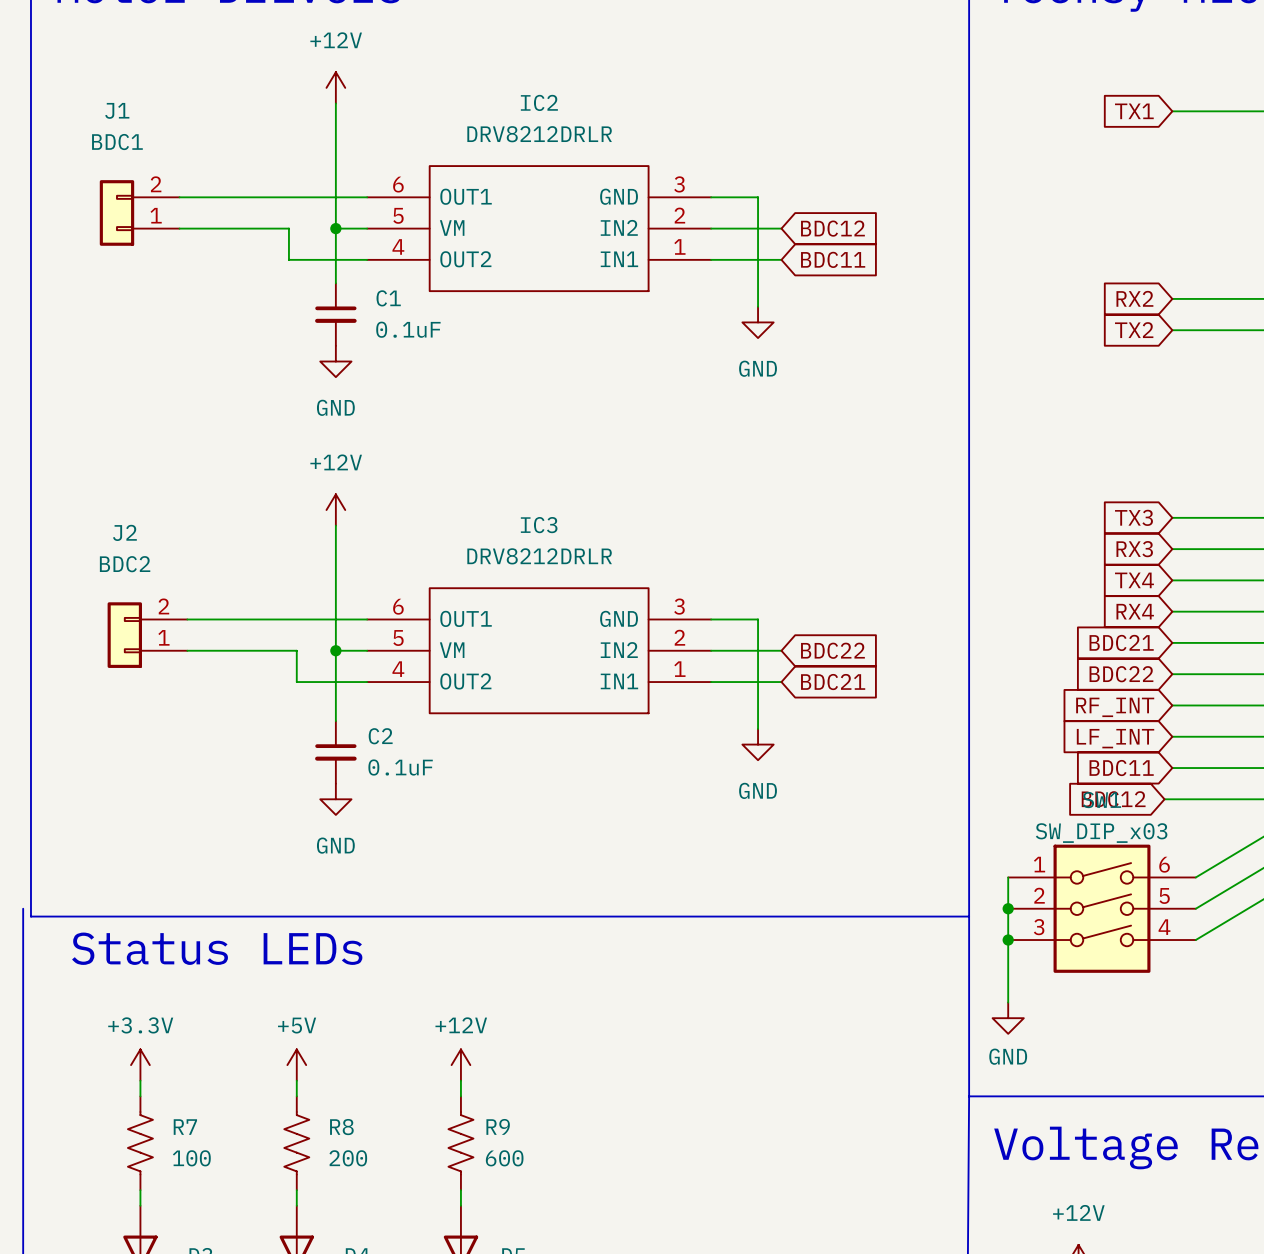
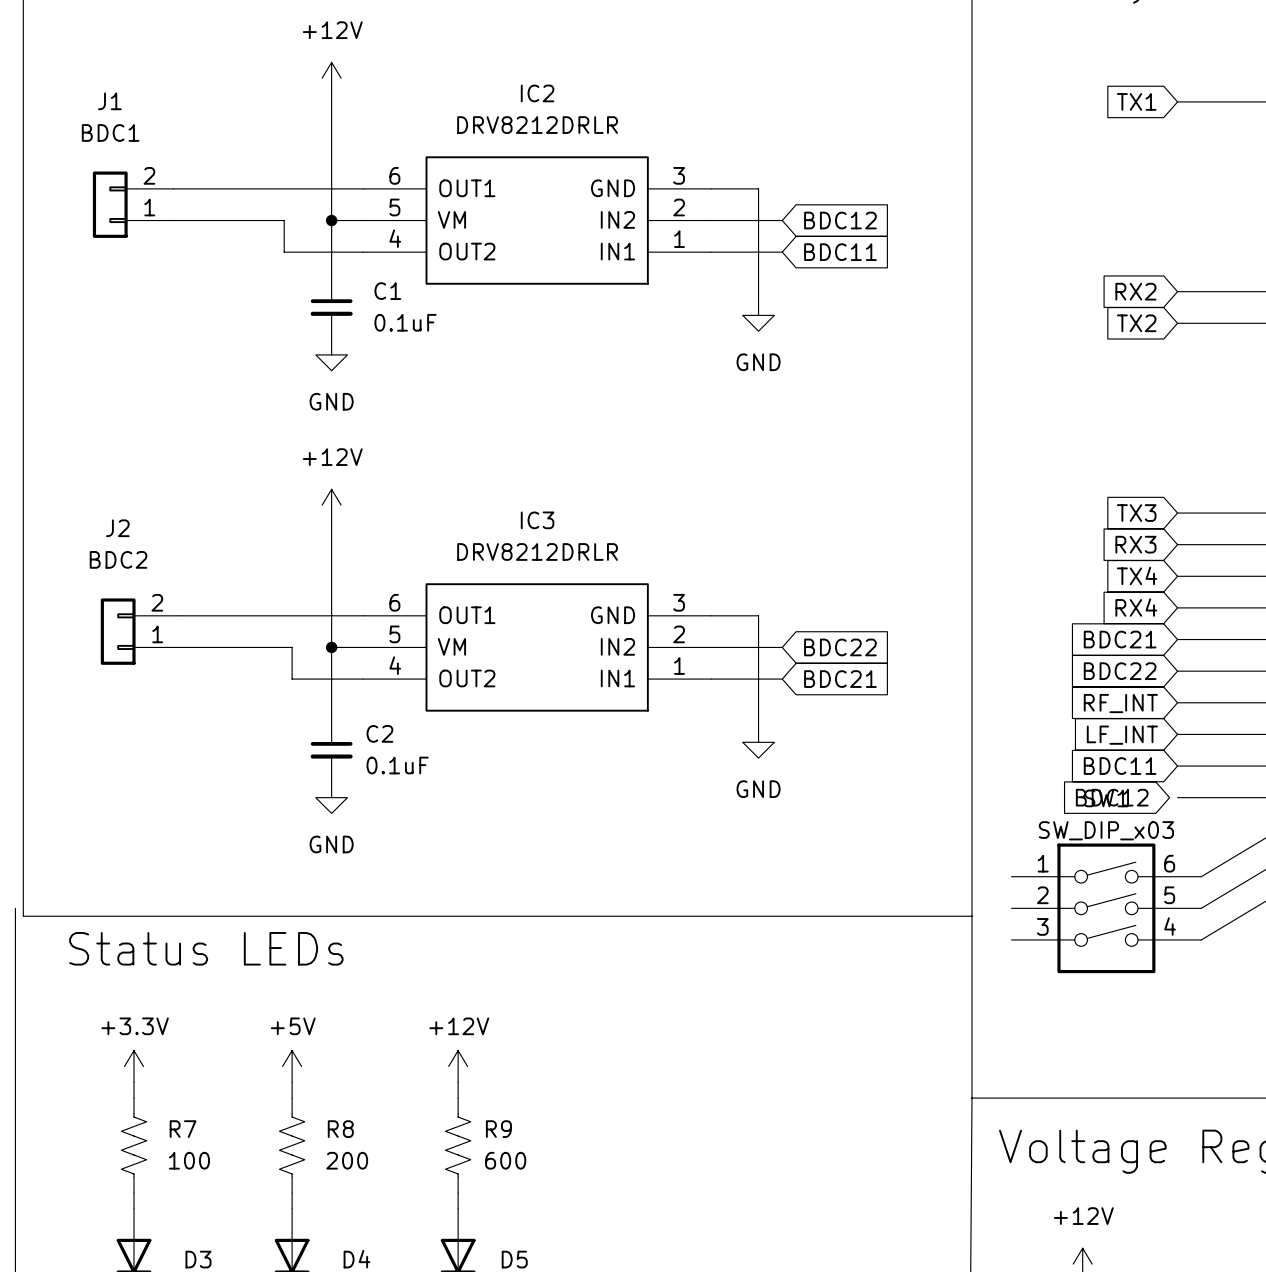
wire: (1164, 799) (1172, 799) -> none
wire: (1008, 877) (1008, 1002) -> none
junction: (1008, 908) -> none
junction: (1008, 940) -> none
power symbol: GND (1008, 1018) -> none

